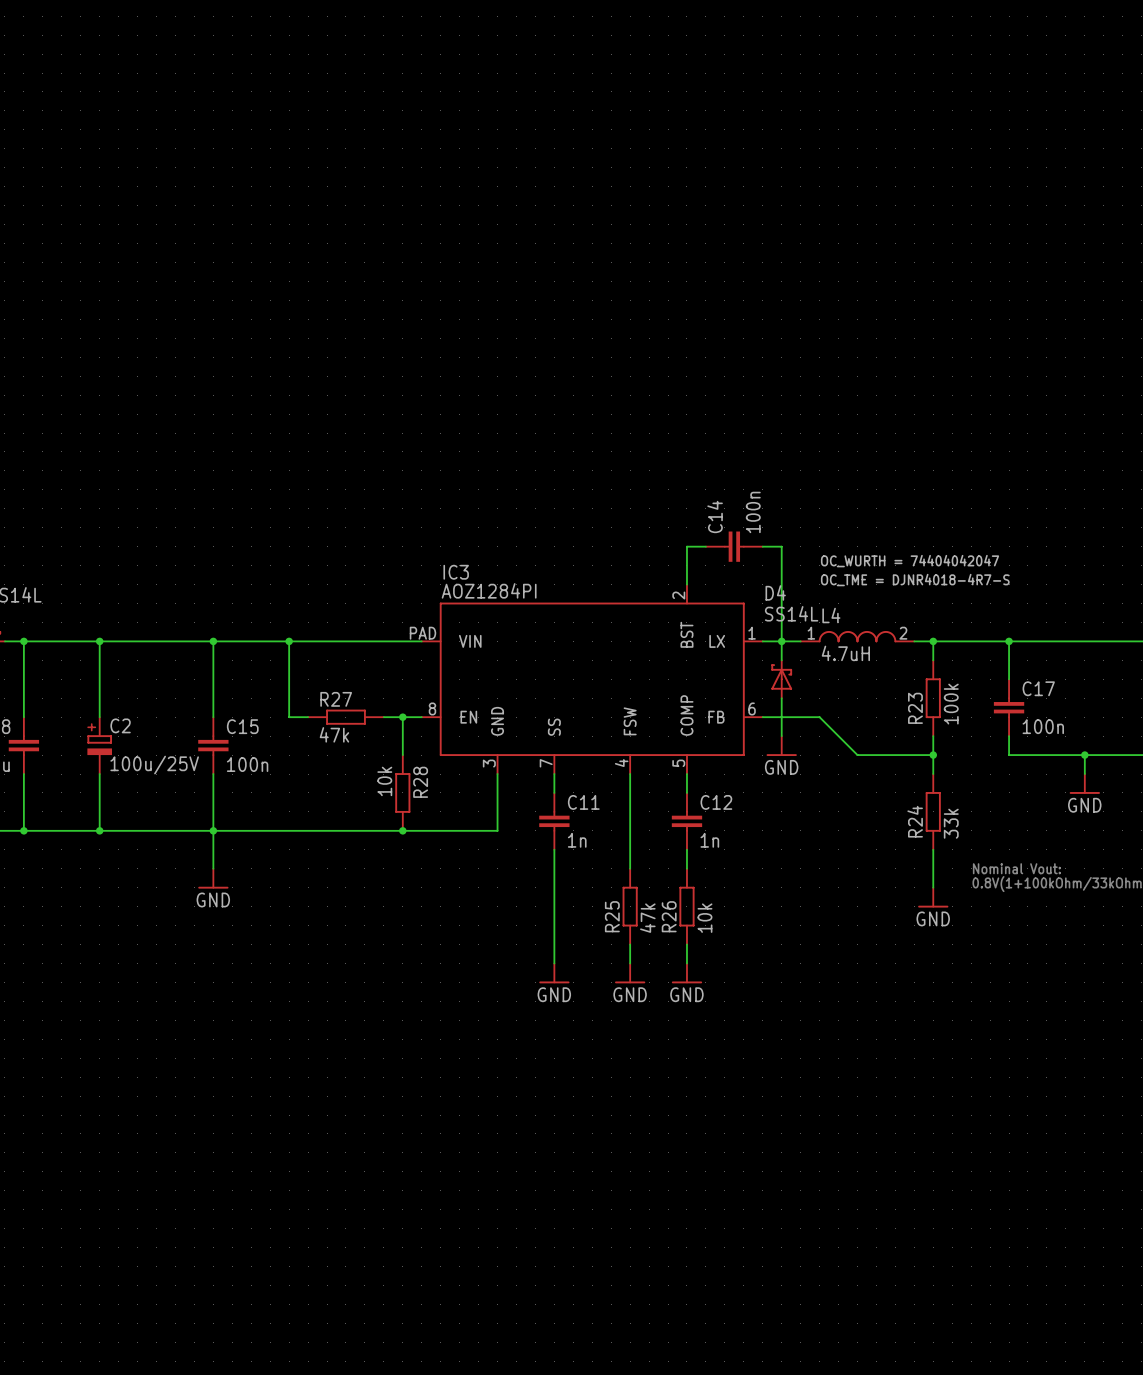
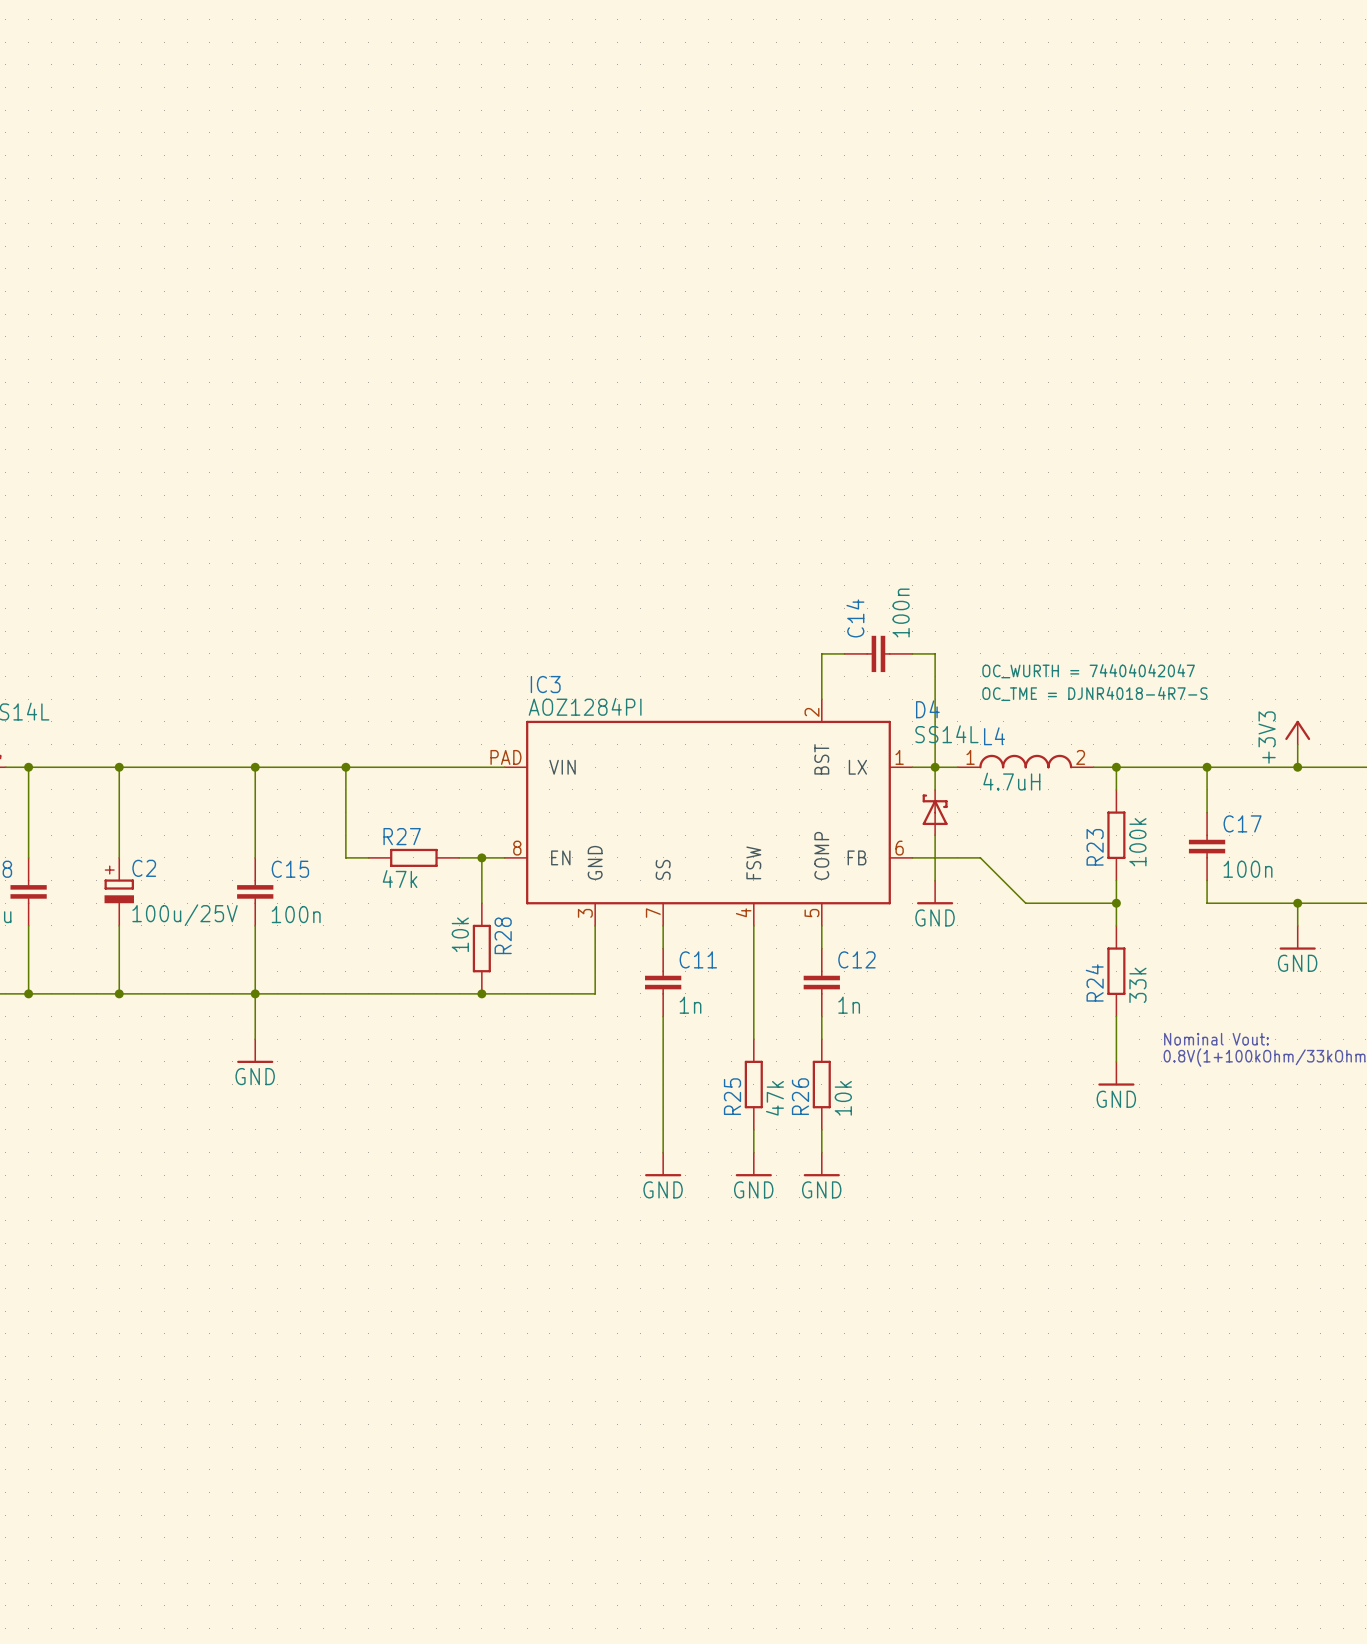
power symbol: none -> +3V3 (1297, 732)
wire: none -> (1297, 744) (1297, 767)
junction: none -> (1297, 767)

